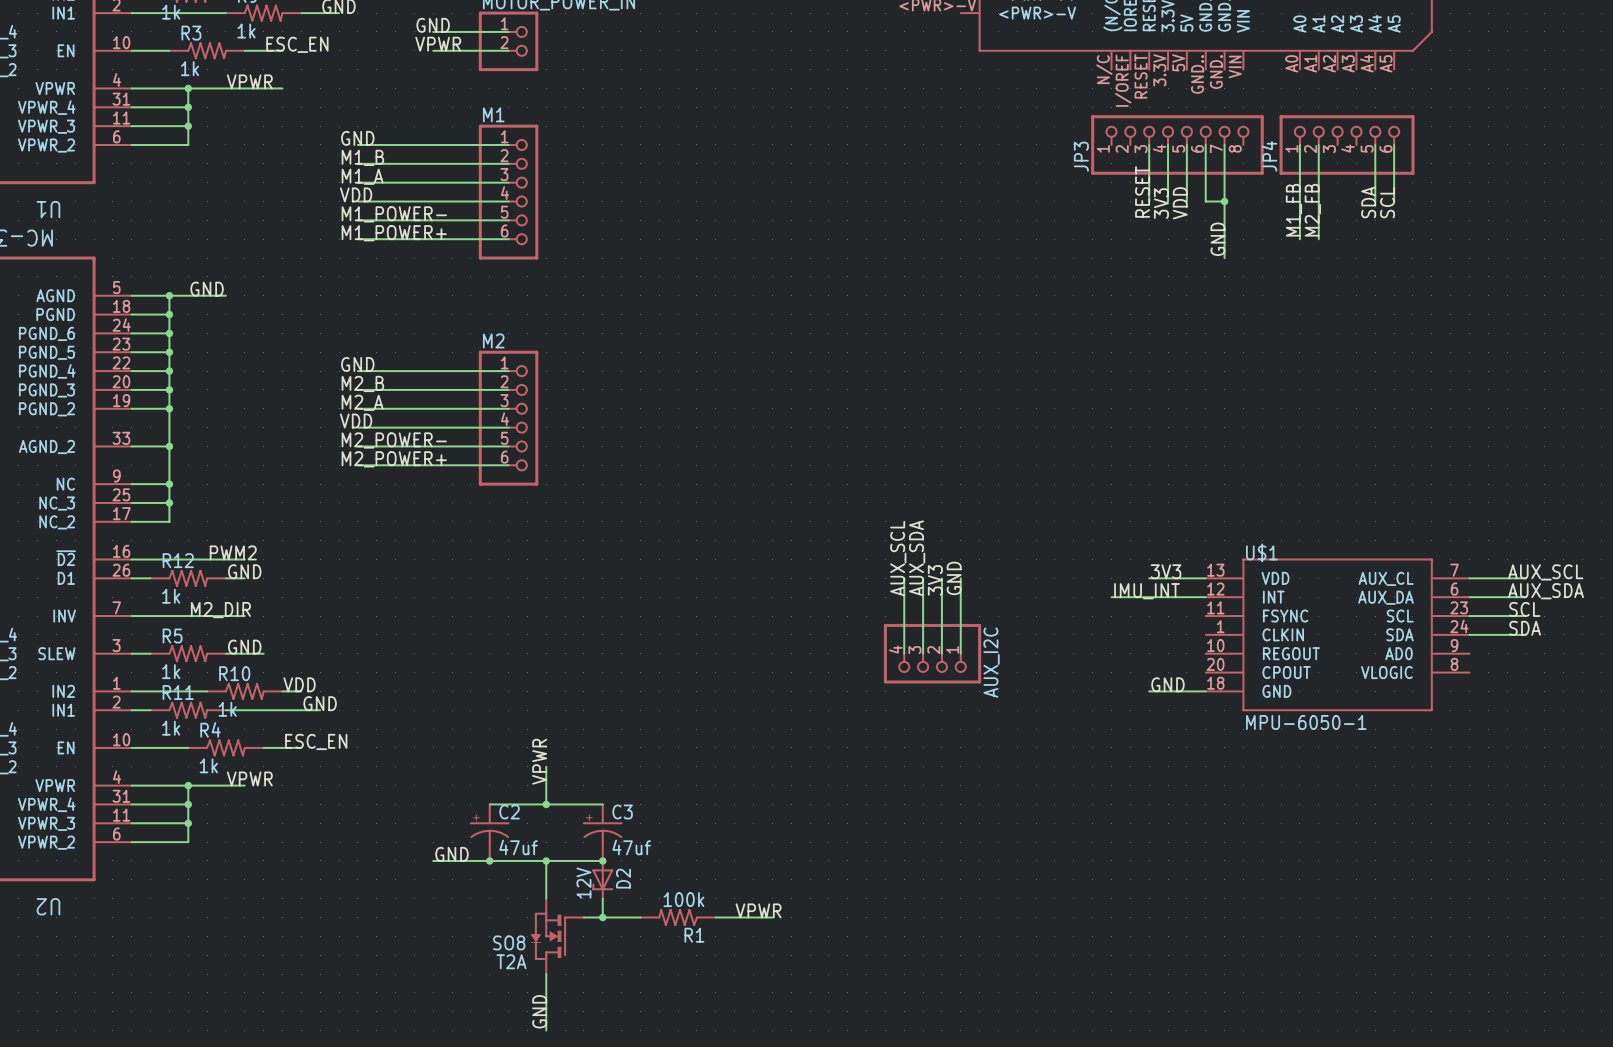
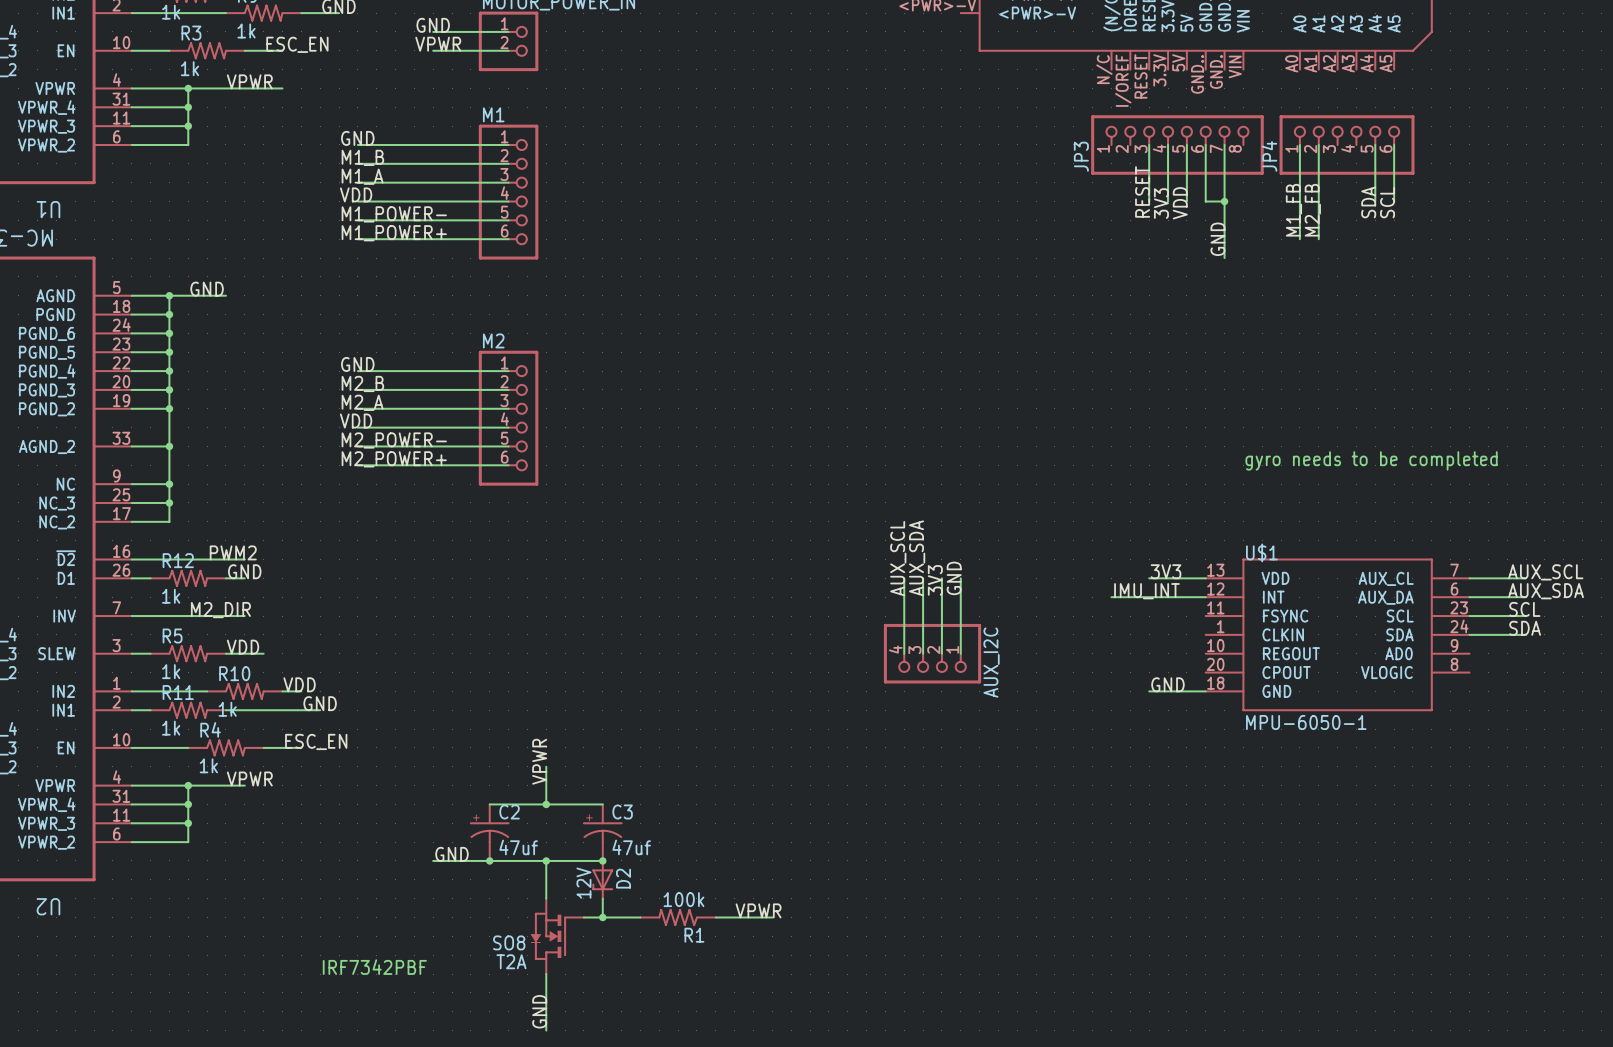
text: none -> gyro needs to be completed (1371, 460)
label: GND (244, 647) -> VDD (243, 647)
text: none -> IRF7342PBF (374, 967)

